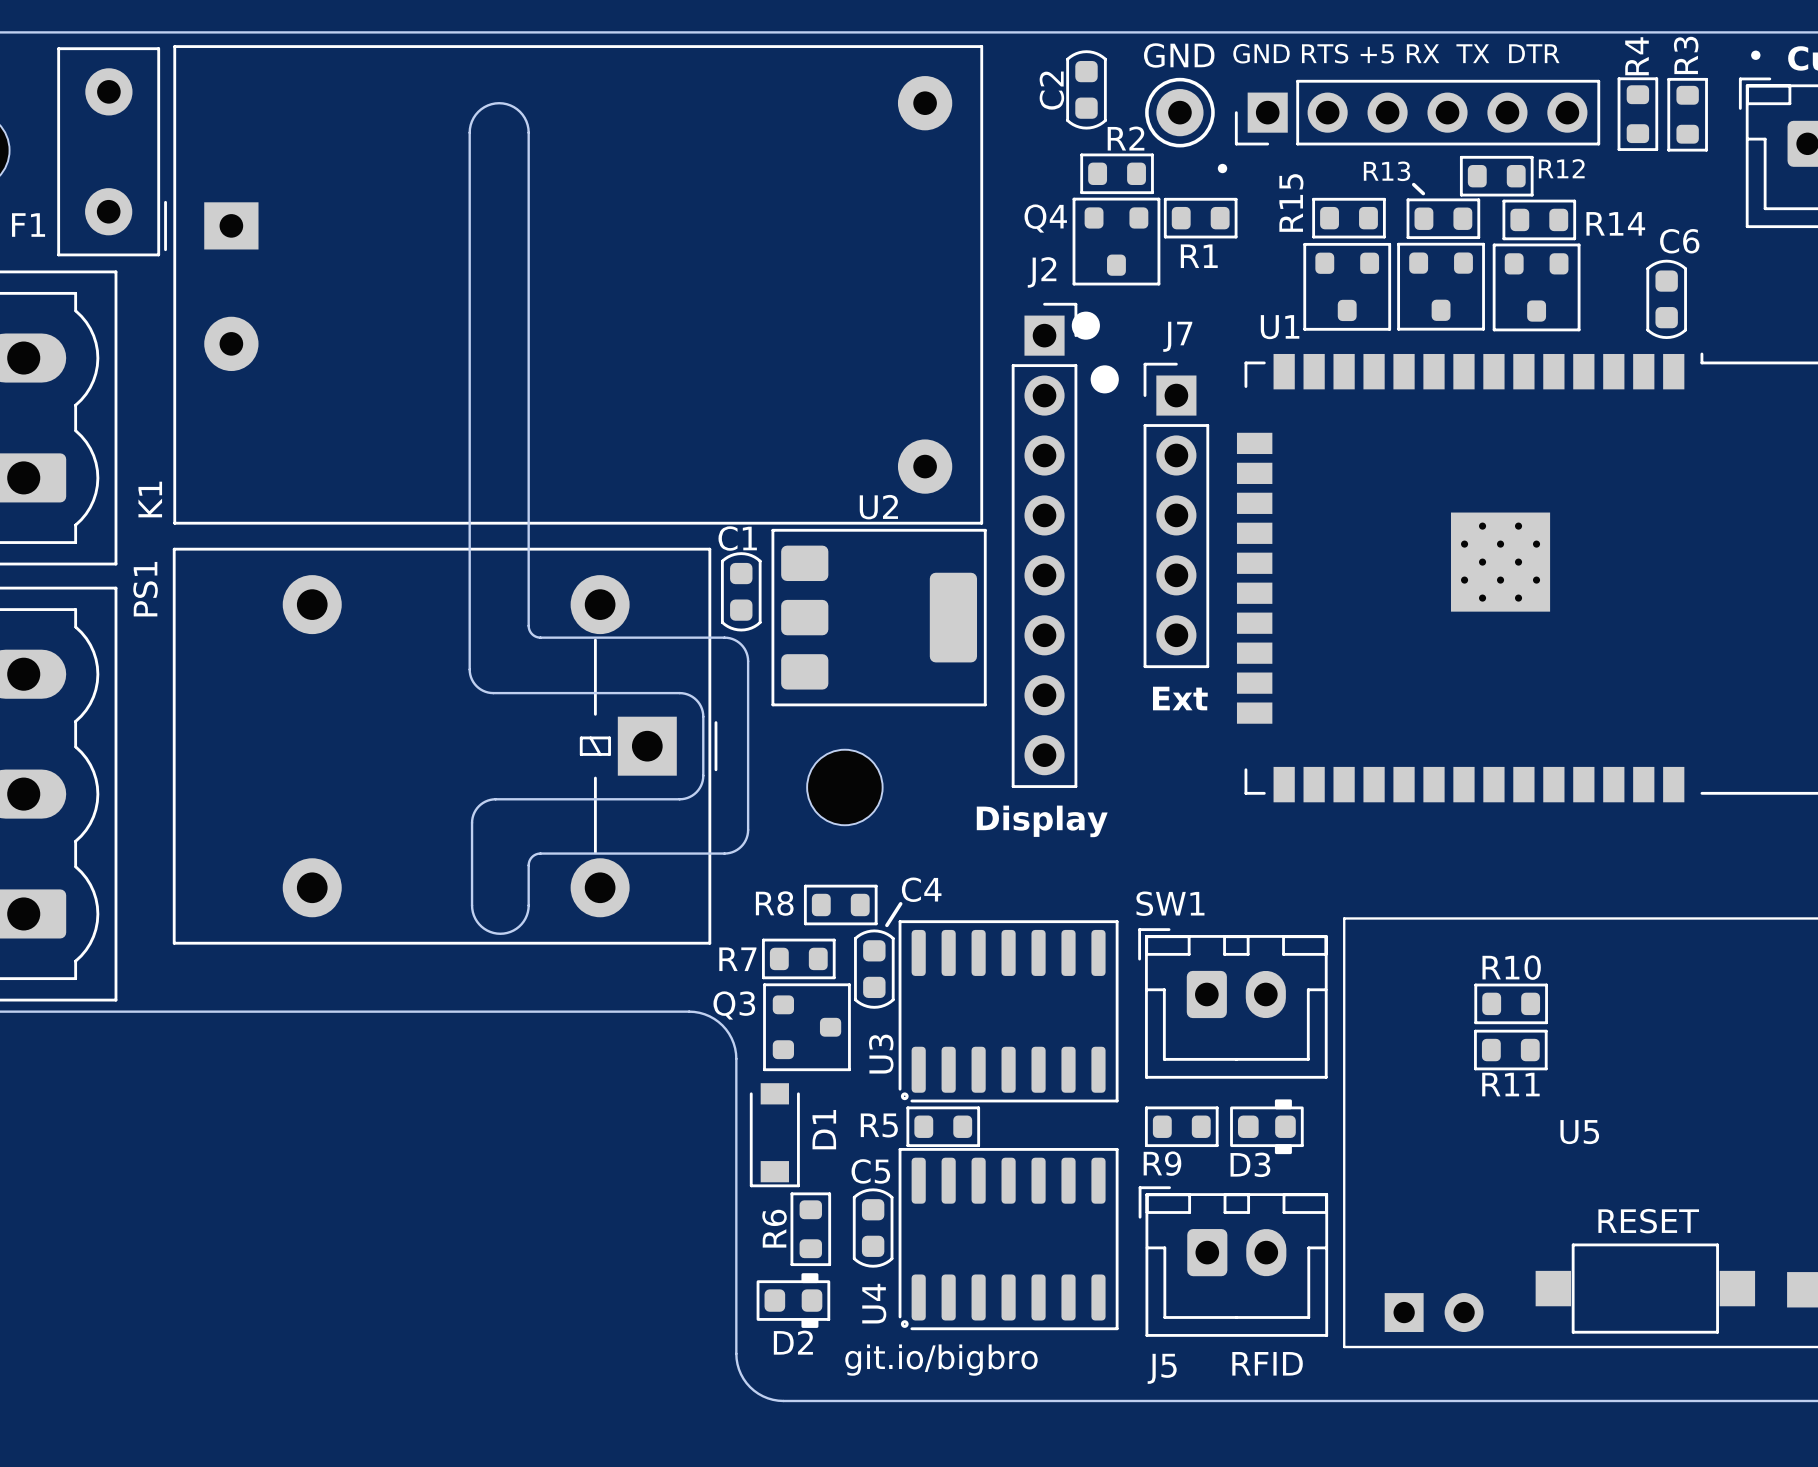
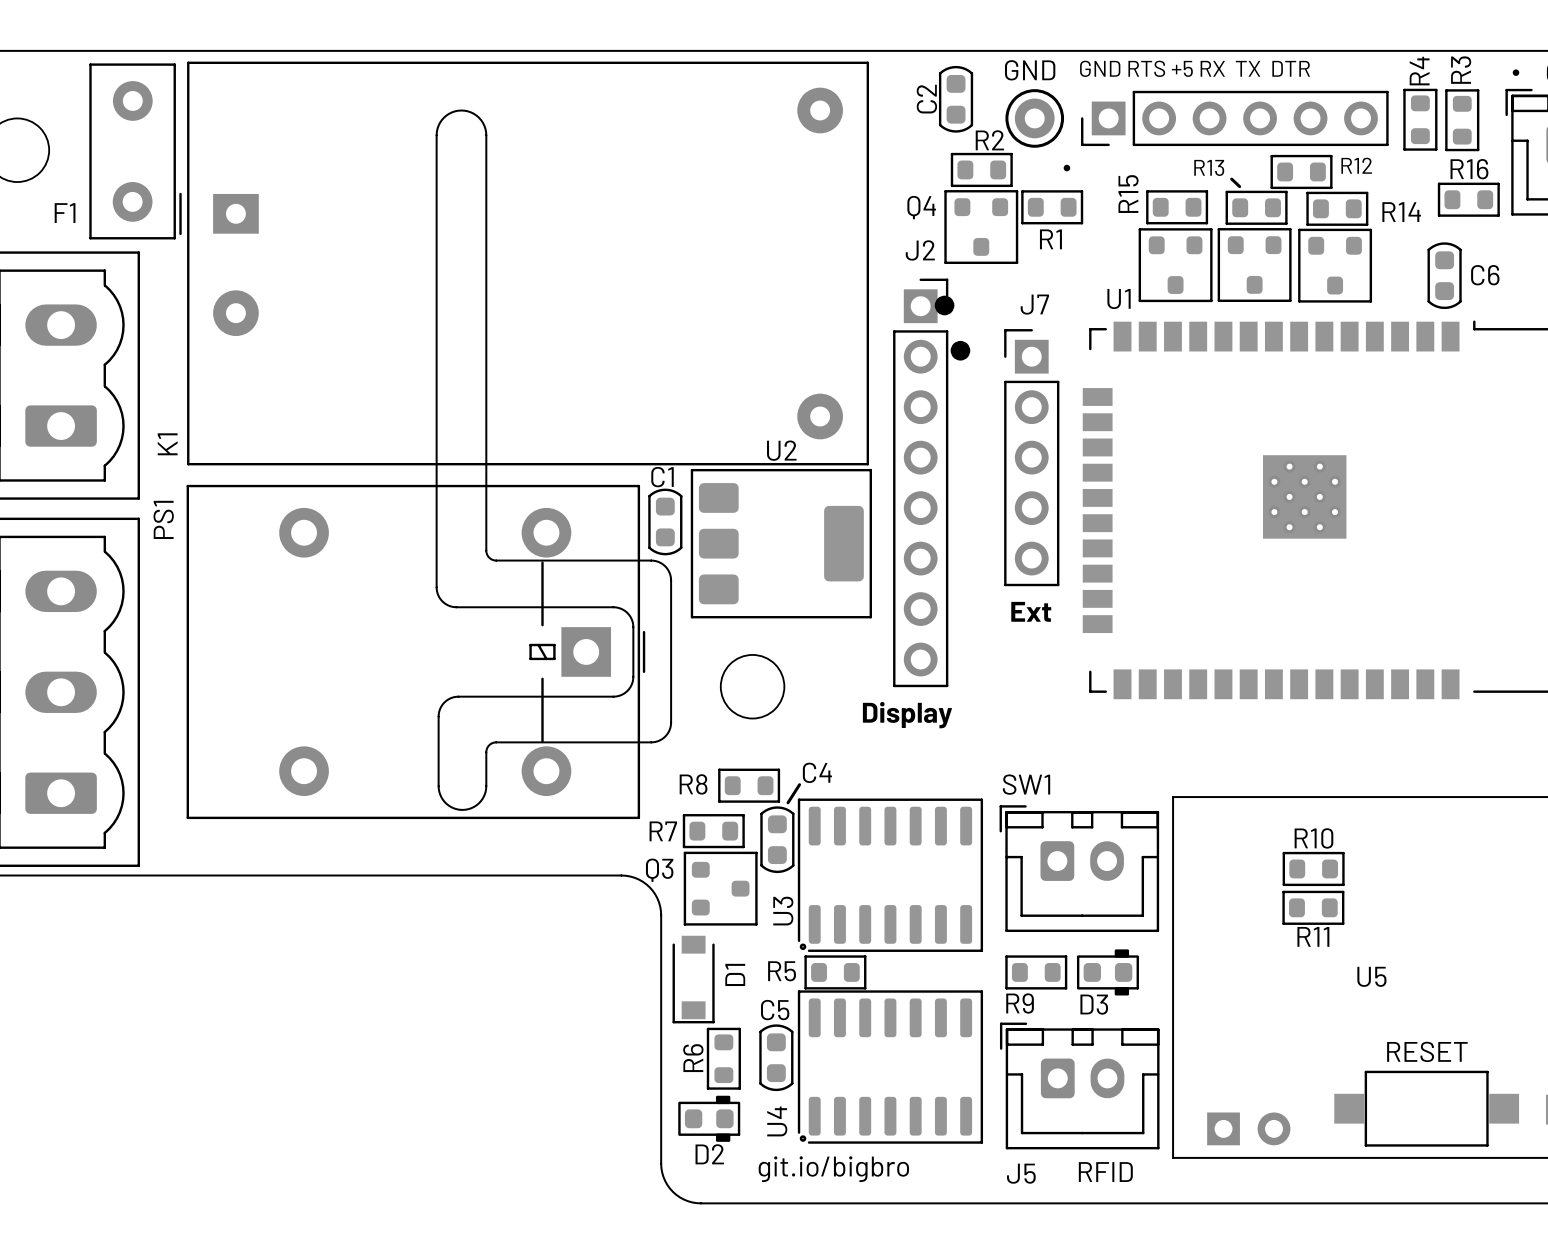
R16: none -> (1468, 199)
C6 name position: C6 (1679, 241) -> C6 (1485, 275)

